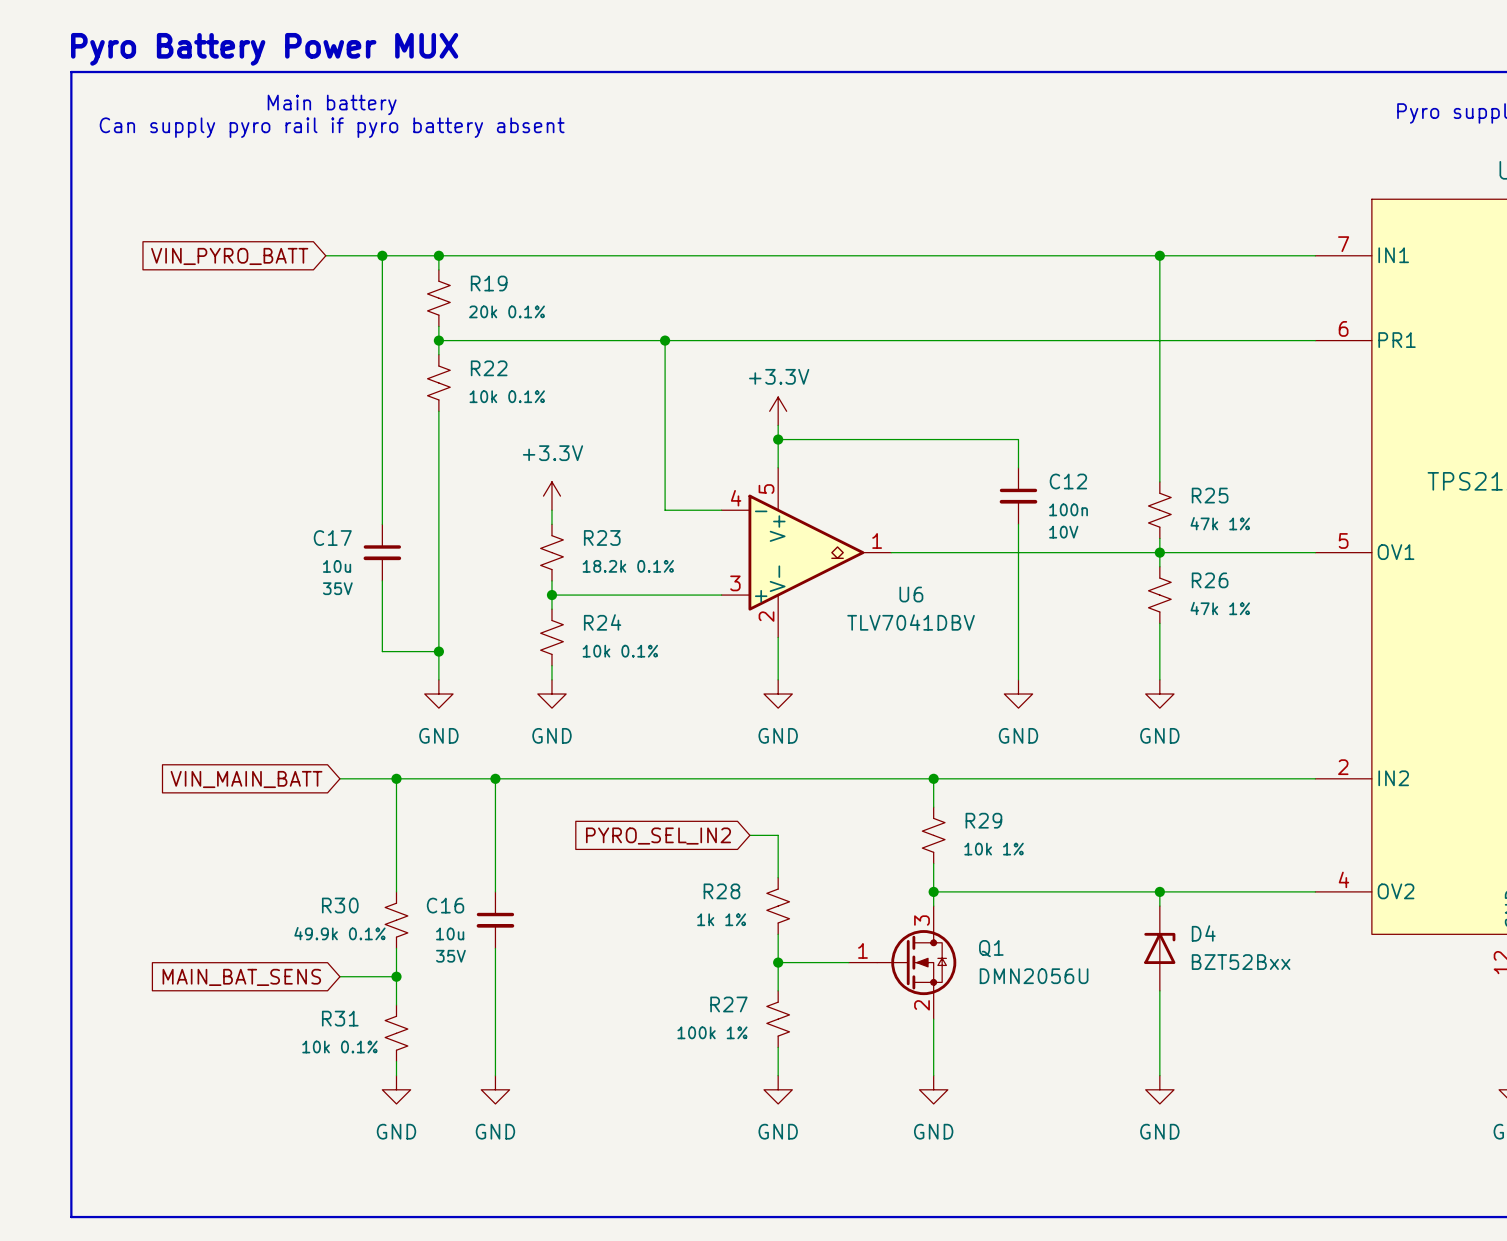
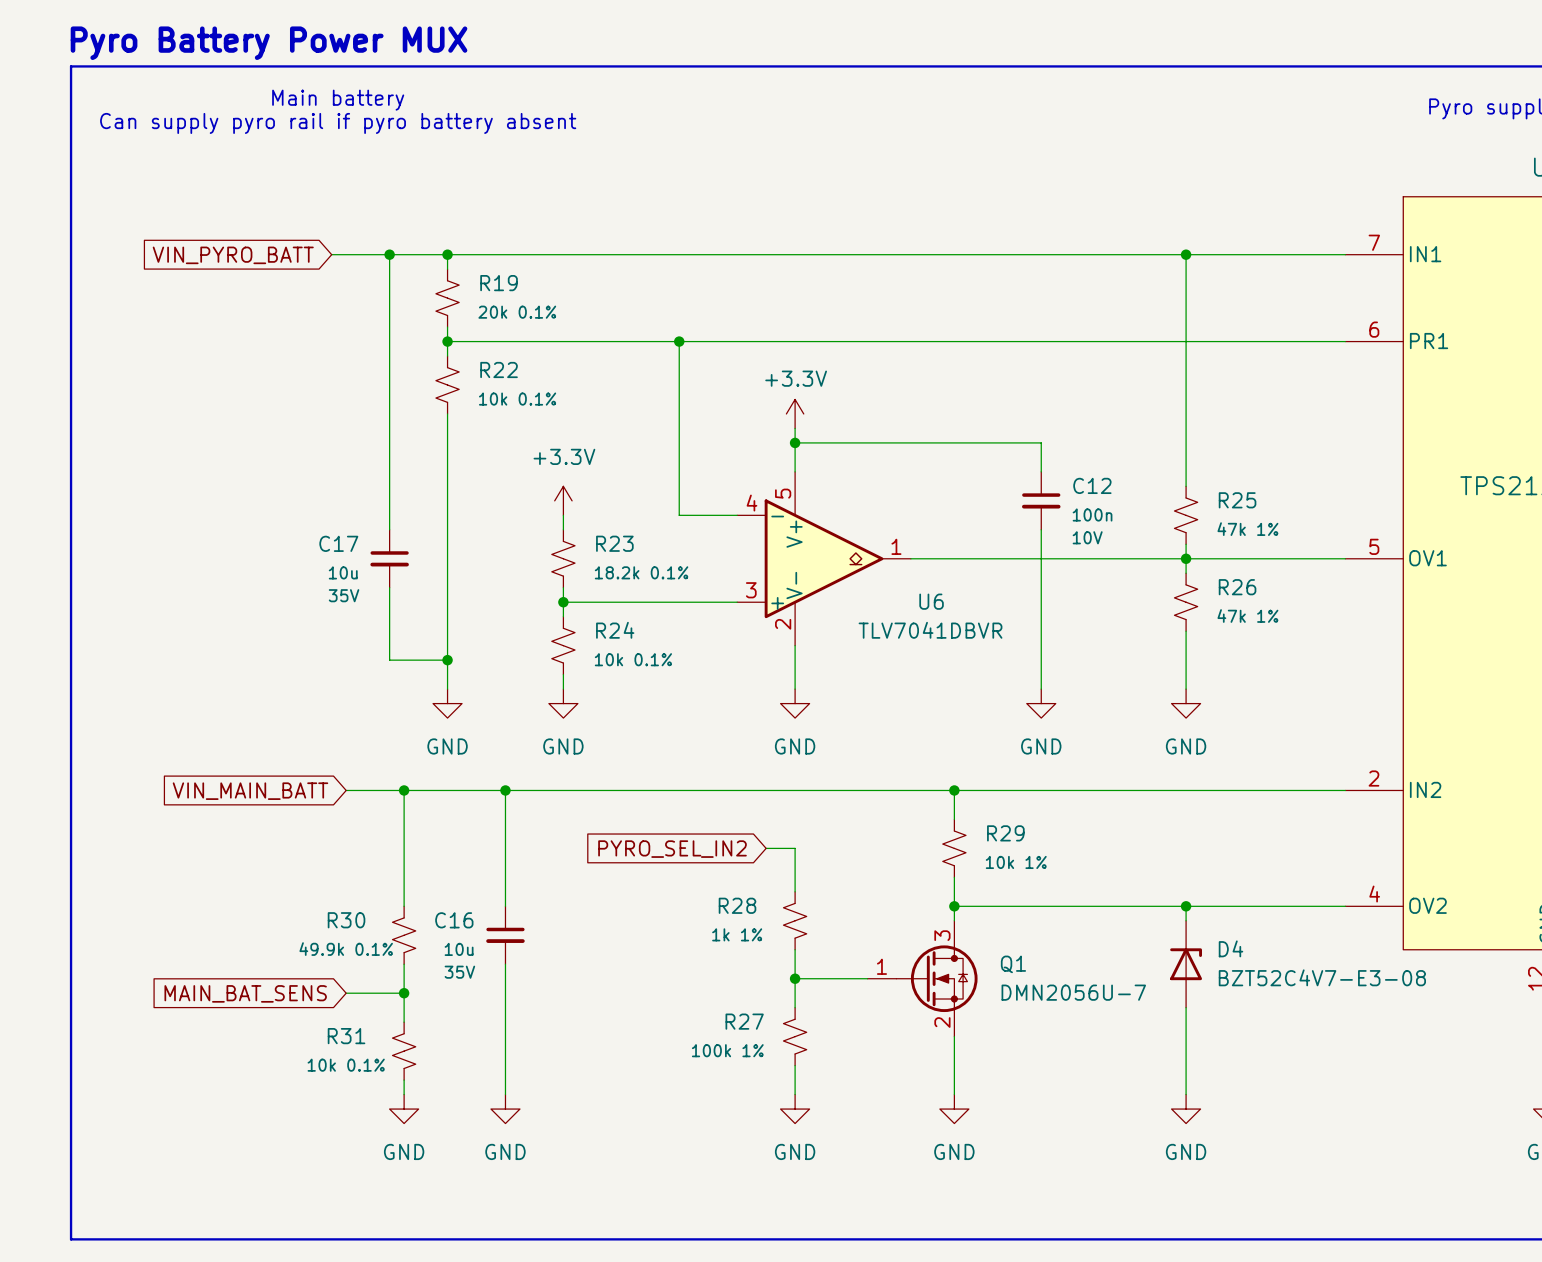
U6 value: TLV7041DBV (911, 622) -> TLV7041DBVR (930, 630)
D4 value: BZT52Bxx (1241, 962) -> BZT52C4V7-E3-08 (1322, 977)
Q1 value: DMN2056U (1034, 976) -> DMN2056U-7 (1073, 992)

